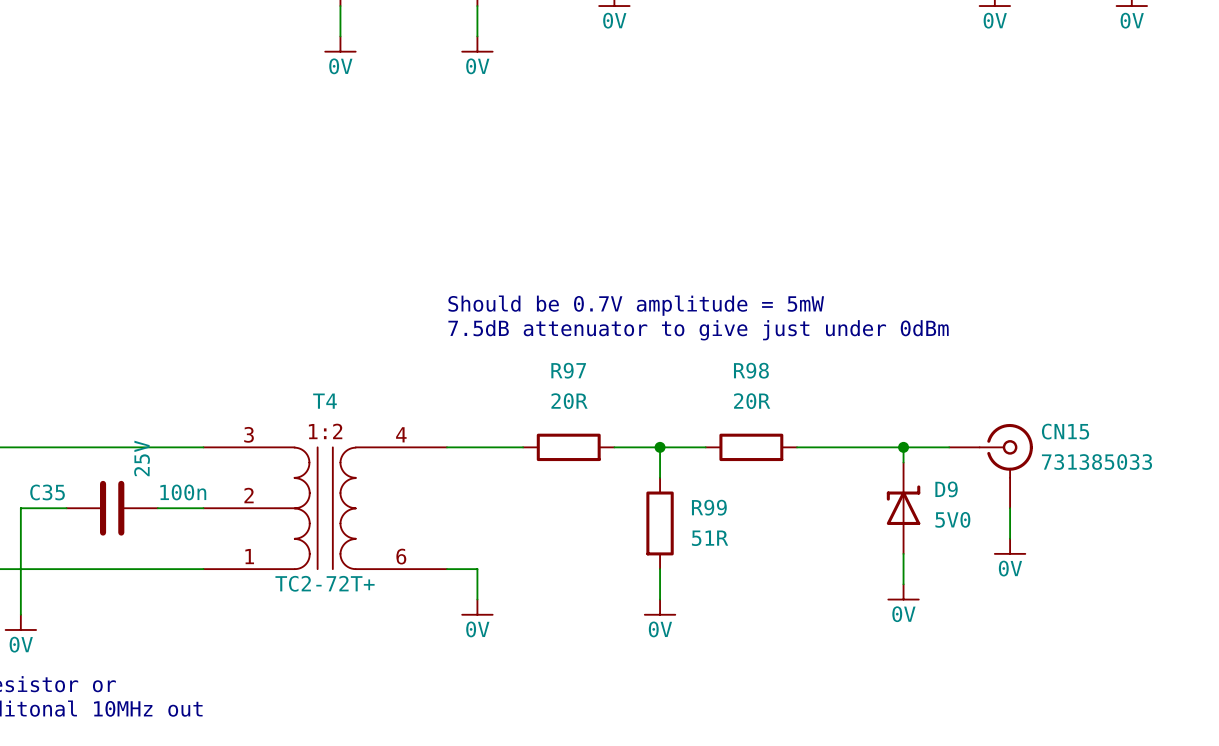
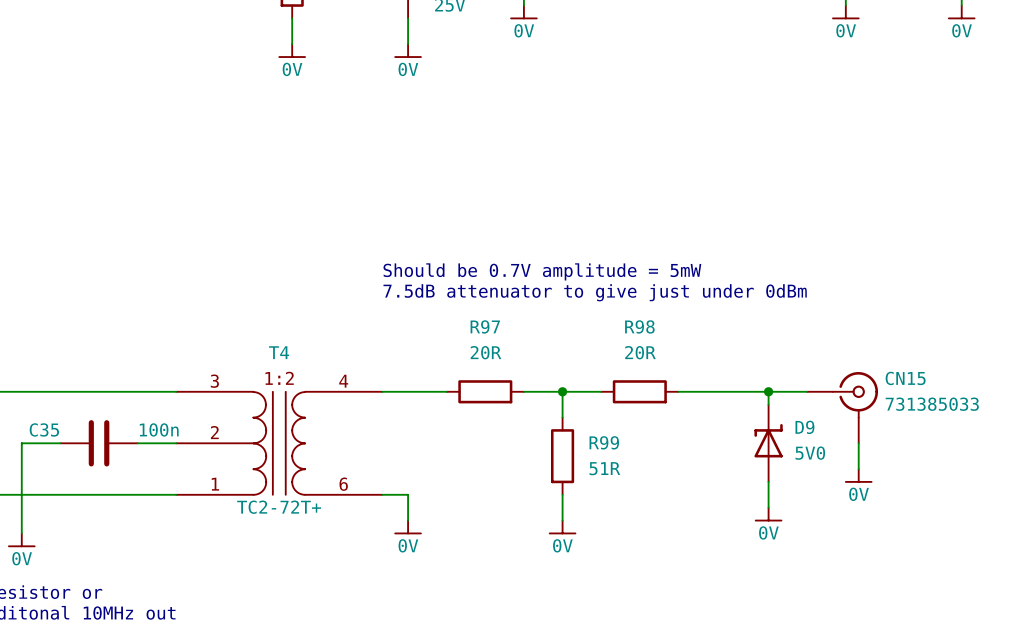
C35 text: 25V (142, 458) -> none

